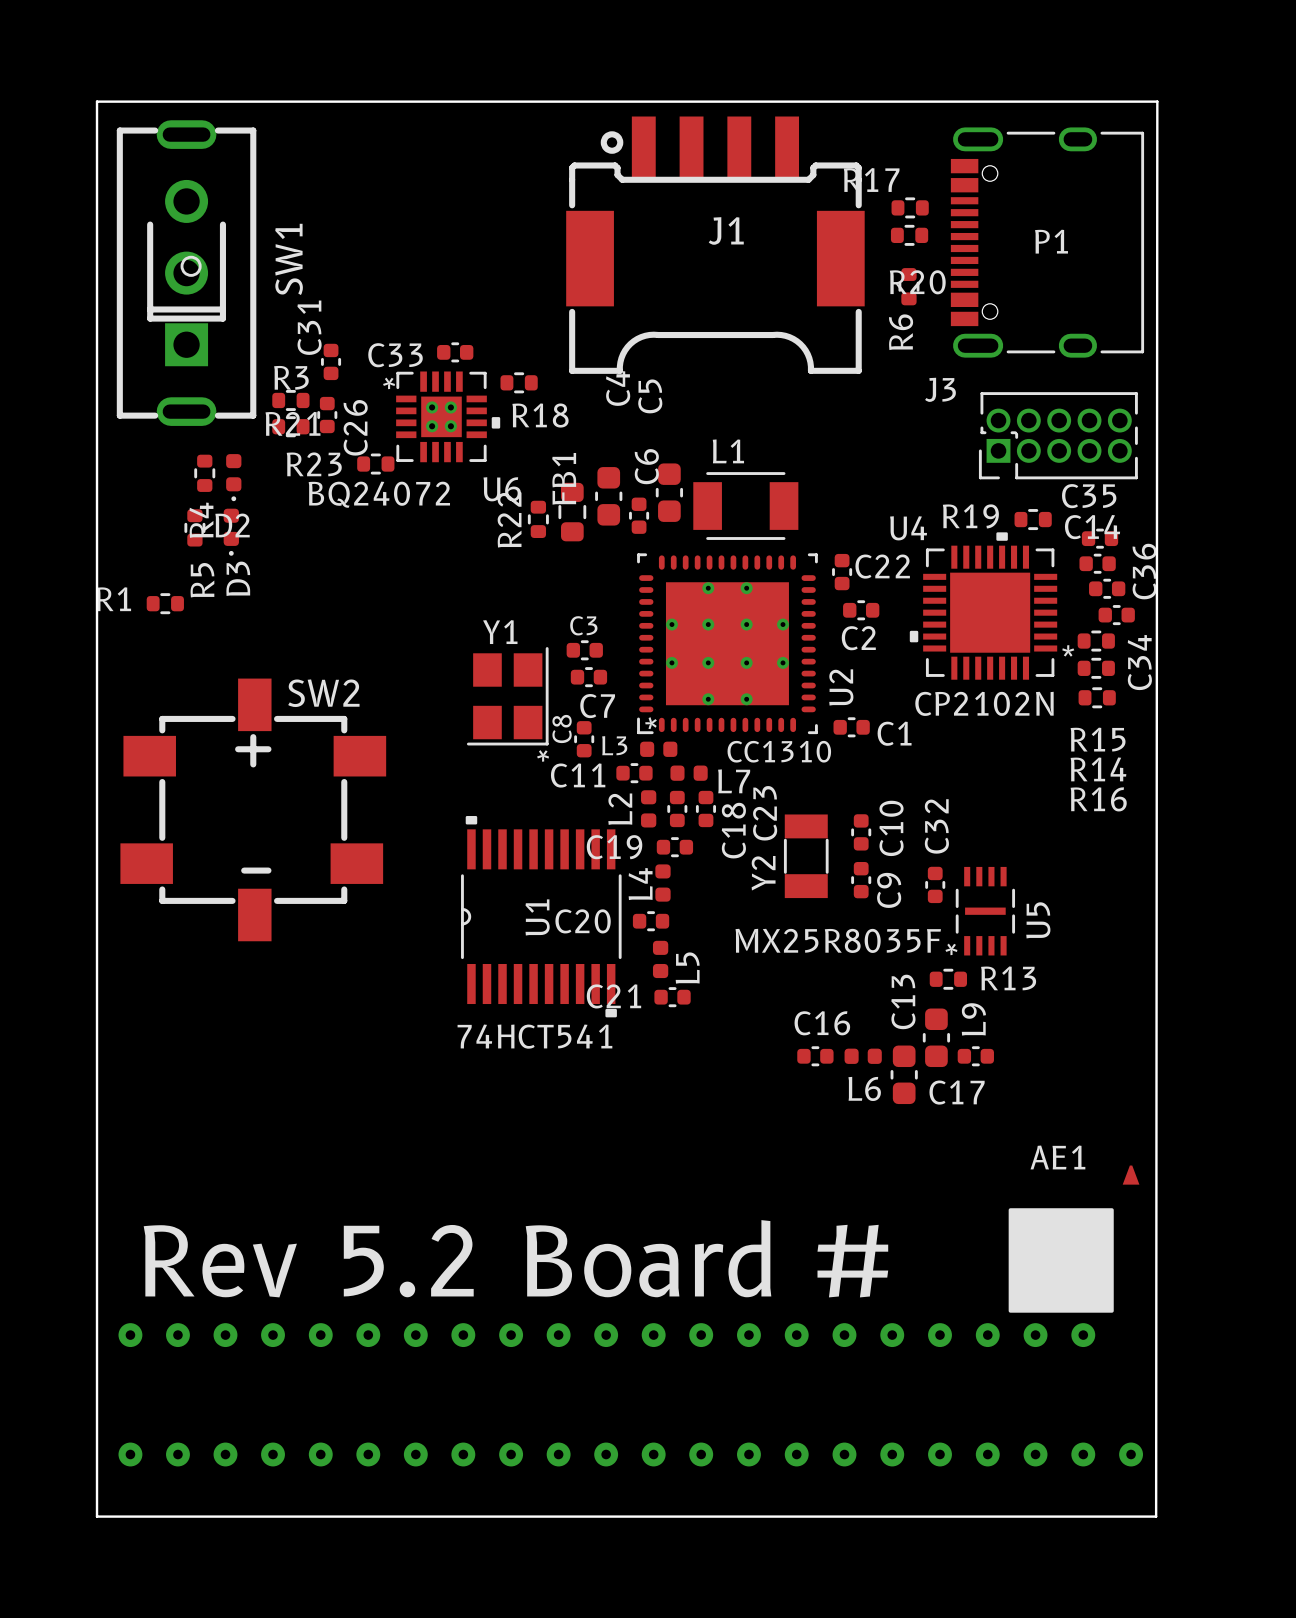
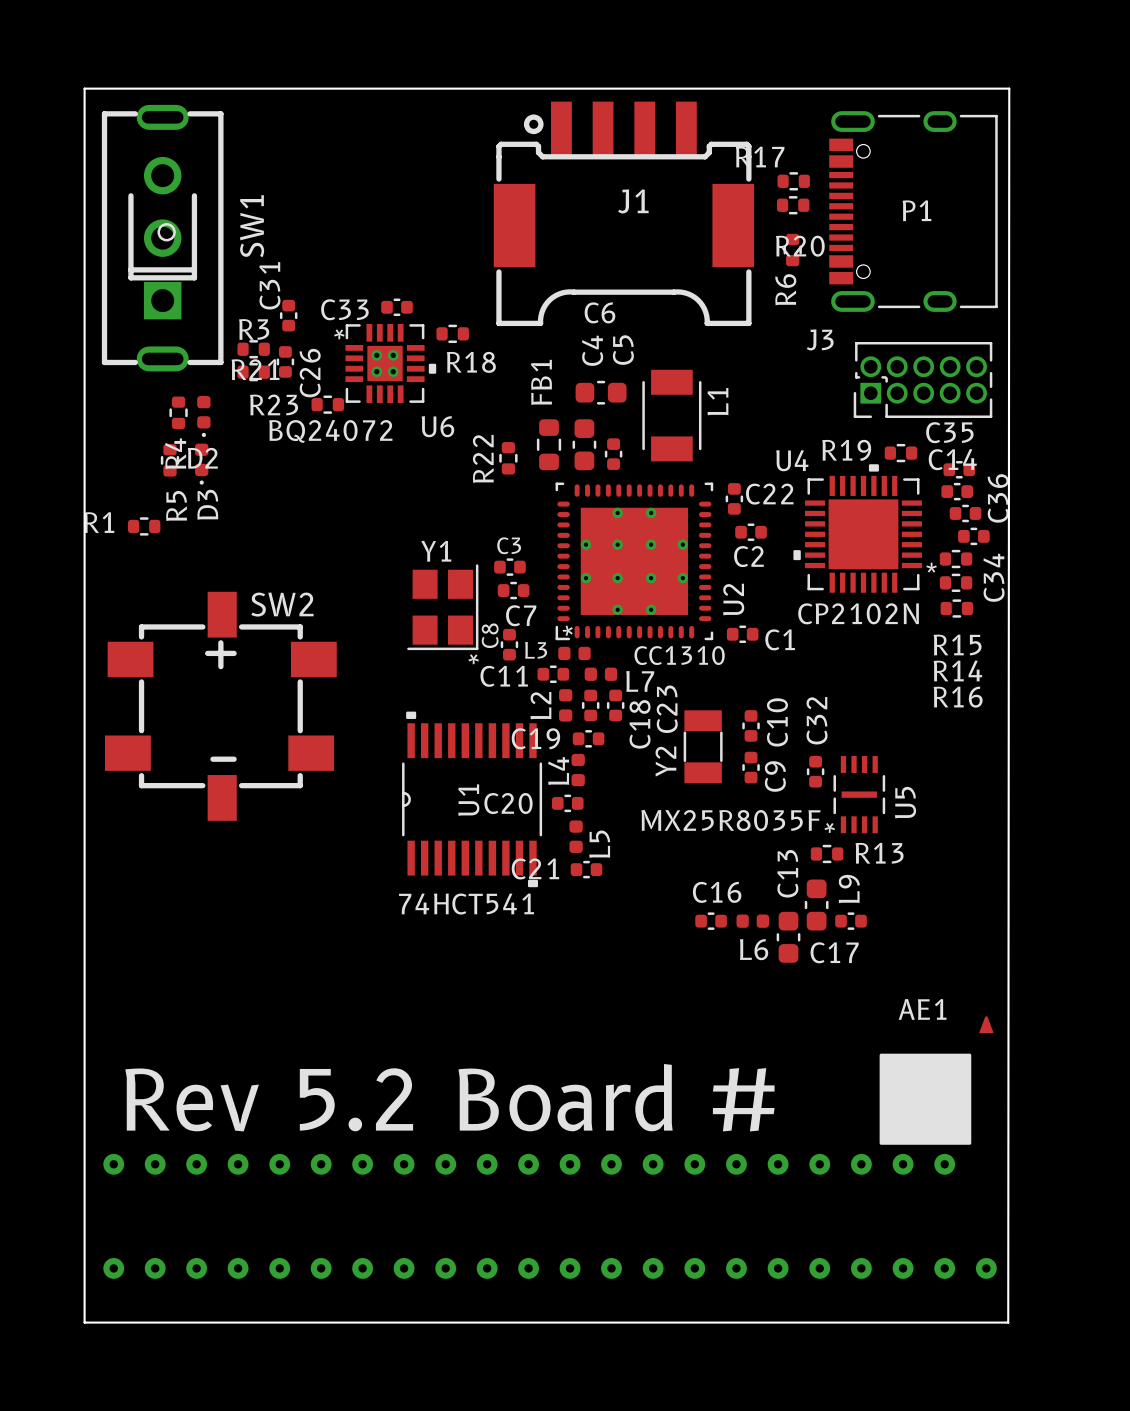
C6 name position: C6 (646, 466) -> C6 (599, 312)
FB1 name position: FB1 (564, 478) -> FB1 (541, 382)
C6 rotation: 0° (669, 492) -> 90° clockwise (601, 392)
C6 position: (669, 492) -> (601, 392)
C4 position: (608, 496) -> (584, 444)
L1 rotation: 0° (745, 506) -> 90° clockwise (671, 415)
FB1 position: (572, 512) -> (549, 444)
C5 position: (639, 515) -> (613, 454)
R22 position: (538, 519) -> (508, 458)

